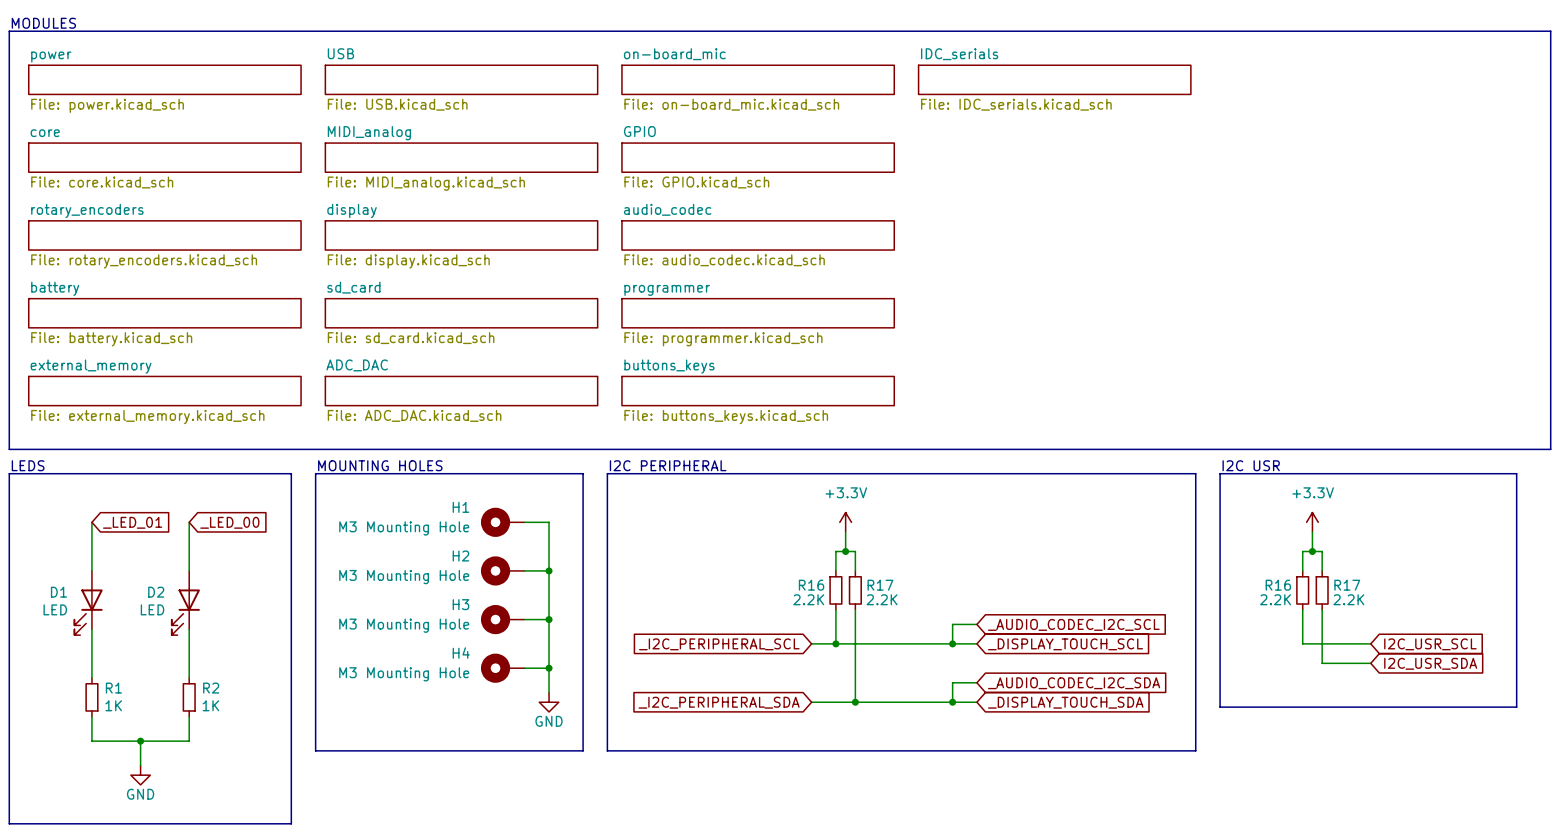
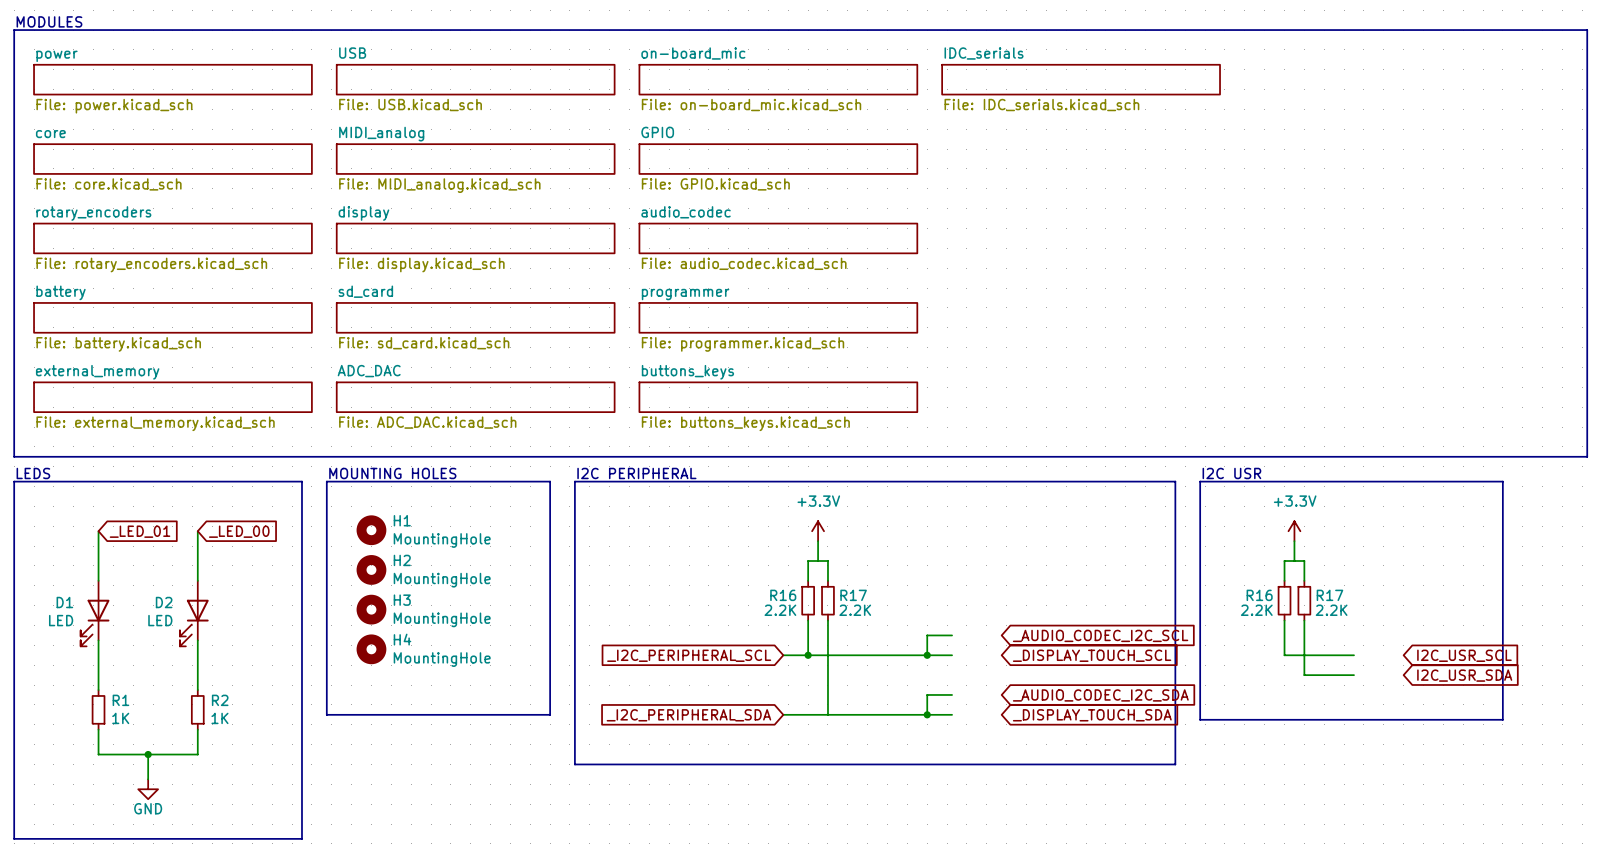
text position: I2C PERIPHERAL (668, 465) -> I2C PERIPHERAL (636, 473)
text position: I2C USR (1251, 465) -> I2C USR (1231, 473)
line: (534, 473) (558, 473) -> (574, 764) (574, 481)
line: (583, 473) (583, 750) -> (599, 481) (624, 481)
line: (607, 473) (607, 750) -> (599, 764) (624, 764)
line: (1147, 473) (1171, 473) -> (1224, 481) (1249, 481)
line: (1195, 473) (1195, 750) (1147, 750) -> (1175, 481) (1175, 764)
line: (1220, 473) (1220, 707) -> (1200, 481) (1200, 719) (1249, 719)
line: (1468, 473) (1516, 473) (1516, 707) (1468, 707) -> (1502, 481) (1502, 719)
H1 name position: H1 (460, 507) -> H1 (402, 520)
H1 symbol: [480, 507, 525, 537] -> [356, 515, 387, 546]
wire: (524, 522) (549, 522) (549, 692) -> none
power symbol position: +3.3V (845, 522) -> +3.3V (818, 531)
power symbol position: +3.3V (1312, 522) -> +3.3V (1294, 531)
H1 value: M3 Mounting Hole (404, 528) -> MountingHole (442, 540)
wire: (845, 532) (845, 551) -> (818, 541) (818, 561)
wire: (1312, 532) (1312, 551) -> (1294, 541) (1294, 561)
junction: (845, 551) -> none
junction: (1312, 551) -> none
H2 name position: H2 (460, 556) -> H2 (402, 560)
H2 symbol: [480, 556, 525, 586] -> [356, 555, 387, 585]
wire: (524, 570) (549, 570) -> none
junction: (549, 570) -> none
wire: (835, 570) (835, 551) (855, 551) (855, 570) -> (808, 580) (808, 561) (827, 561) (827, 580)
wire: (1302, 570) (1302, 551) (1322, 551) (1322, 570) -> (1284, 580) (1284, 561) (1304, 561) (1304, 580)
H2 value: M3 Mounting Hole (404, 577) -> MountingHole (442, 580)
R16 position: (835, 590) -> (808, 600)
R17 position: (855, 590) -> (827, 600)
R16 position: (1302, 590) -> (1284, 600)
R17 position: (1322, 590) -> (1304, 600)
H3 name position: H3 (460, 604) -> H3 (402, 600)
H3 symbol: [480, 604, 525, 635] -> [356, 594, 387, 625]
wire: (835, 609) (835, 643) -> (808, 620) (808, 655)
wire: (855, 609) (855, 702) -> (827, 620) (827, 714)
wire: (1302, 609) (1302, 643) -> (1284, 620) (1284, 655) (1334, 655)
wire: (1322, 609) (1322, 663) (1370, 663) -> (1304, 620) (1304, 675) (1353, 675)
wire: (524, 619) (549, 619) -> none
junction: (549, 619) -> none
wire: (976, 624) (952, 624) (952, 643) -> (952, 635) (927, 635) (927, 655)
H3 value: M3 Mounting Hole (404, 625) -> MountingHole (442, 619)
junction: none -> (808, 655)
junction: (835, 643) -> none
junction: none -> (927, 655)
wire: (928, 643) (976, 643) -> (783, 655) (832, 655)
junction: (952, 643) -> none
wire: (1322, 643) (1370, 643) -> none
global label position: _I2C_PERIPHERAL_SCL (719, 644) -> _I2C_PERIPHERAL_SCL (689, 655)
H4 name position: H4 (461, 653) -> H4 (402, 639)
H4 symbol: [480, 653, 525, 683] -> [356, 634, 387, 665]
wire: (524, 668) (549, 668) -> none
junction: (549, 668) -> none
H4 value: M3 Mounting Hole (404, 674) -> MountingHole (442, 659)
wire: (976, 682) (952, 682) (952, 702) -> (952, 694) (927, 694) (927, 714)
line: (315, 702) (315, 750) (558, 750) -> (326, 714) (550, 714) (550, 481)
power symbol: GND (549, 702) -> none
global label position: _I2C_PERIPHERAL_SDA (719, 702) -> _I2C_PERIPHERAL_SDA (688, 715)
junction: (855, 702) -> none
junction: none -> (927, 714)
wire: (928, 702) (976, 702) -> (783, 714) (832, 714)
junction: (952, 702) -> none

